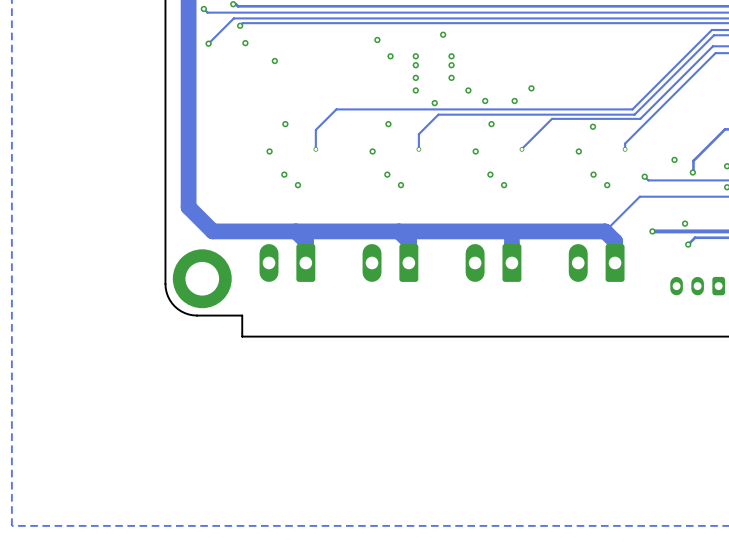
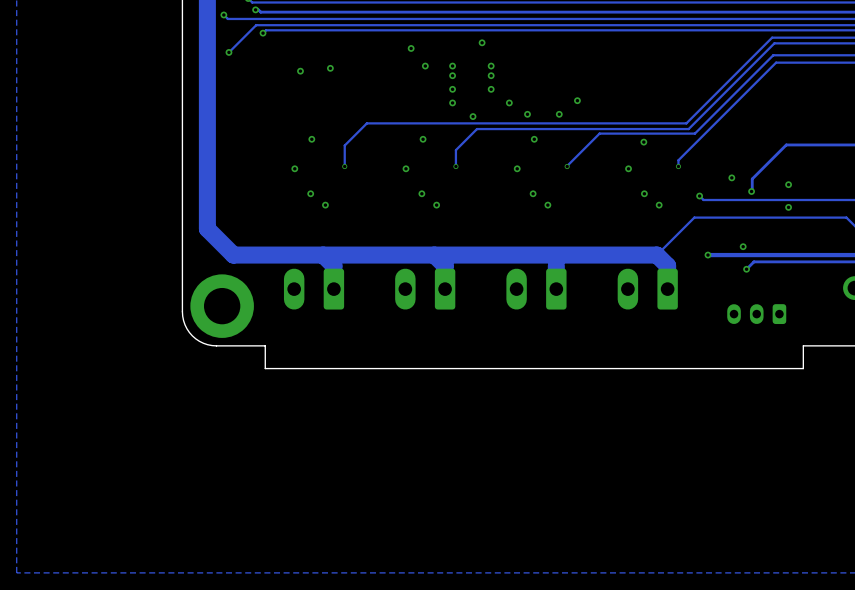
via position: (245, 43) -> (330, 68)

